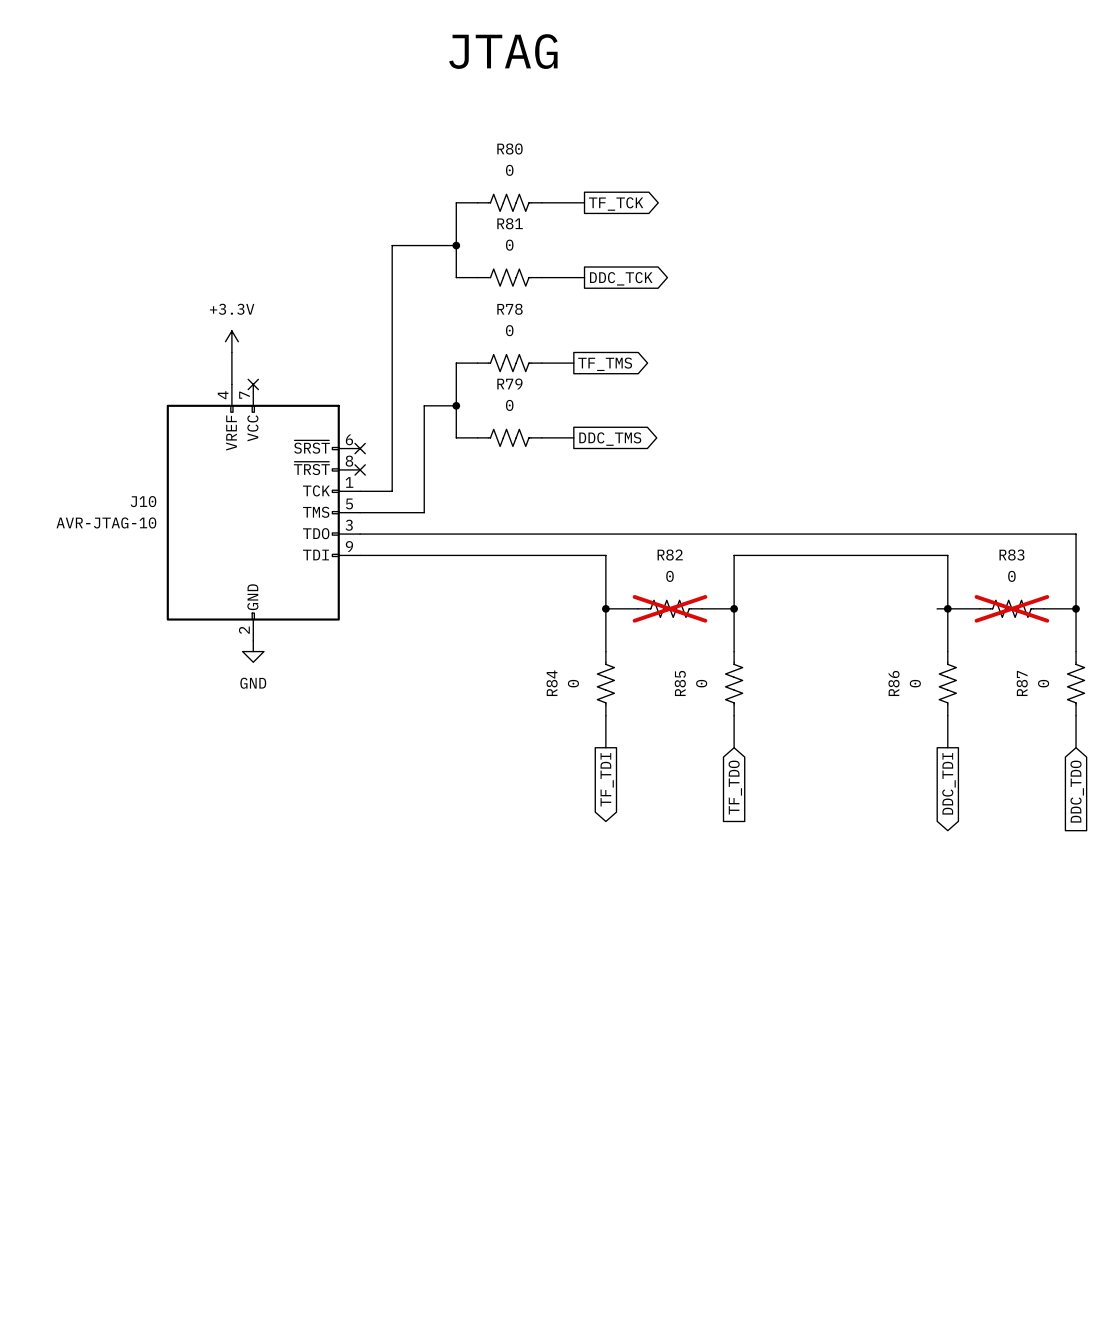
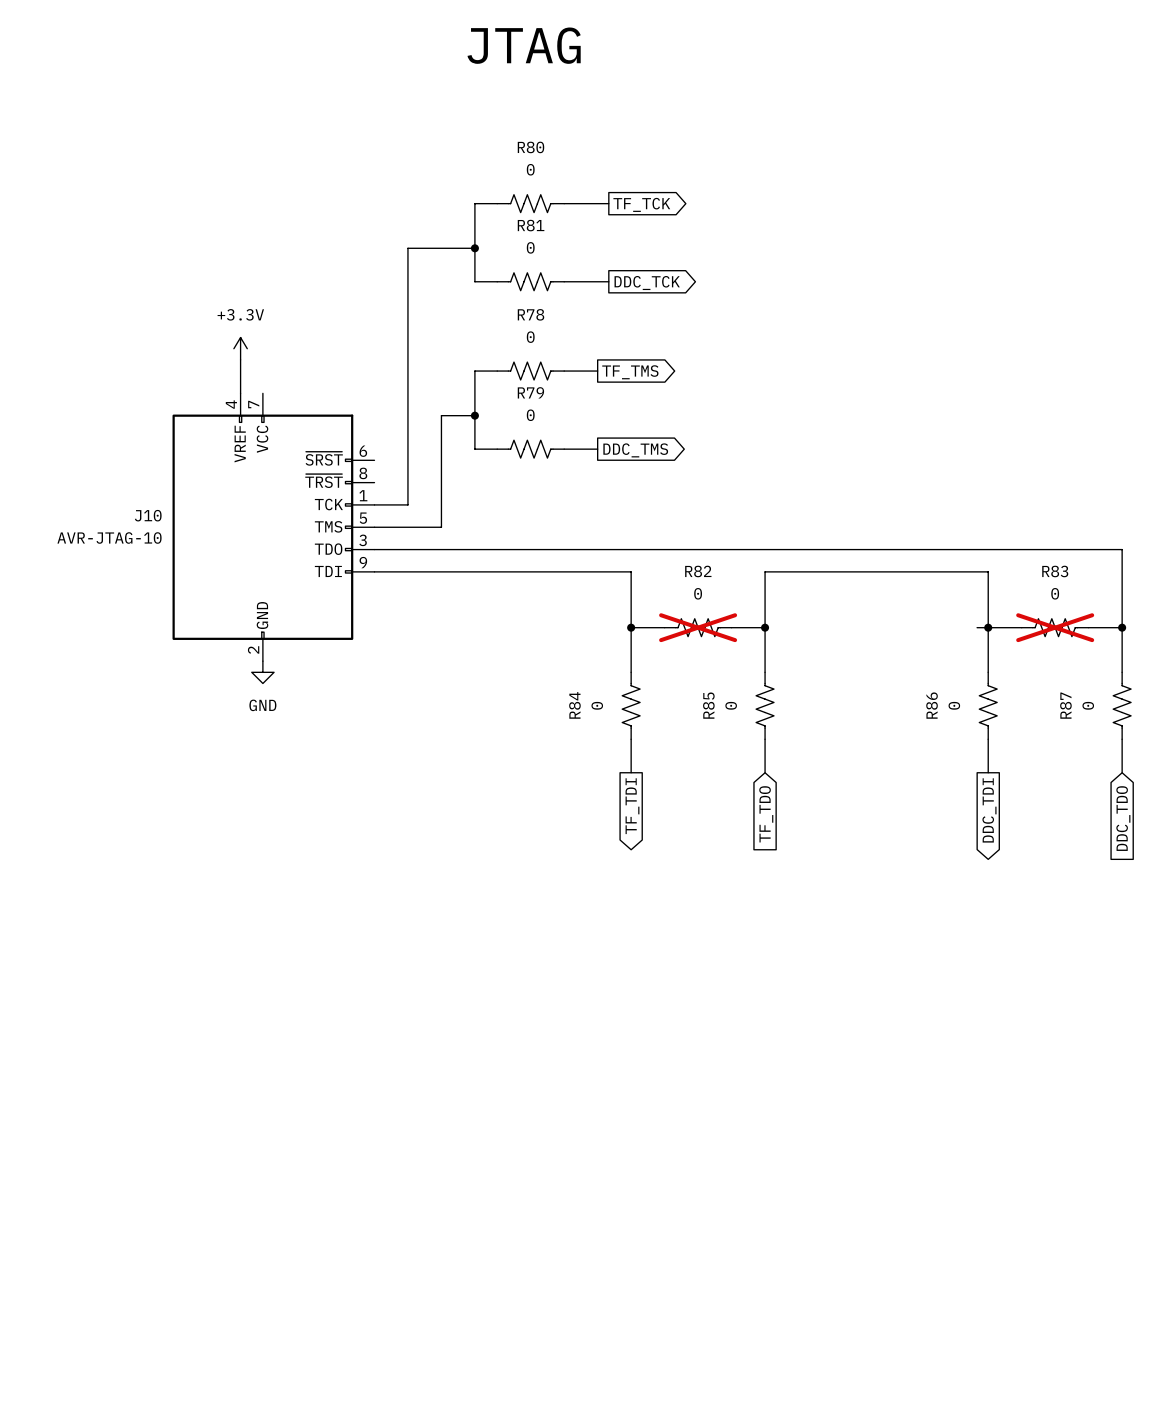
no-connect mark: (253, 384) -> none
no-connect mark: (360, 448) -> none
no-connect mark: (360, 469) -> none

